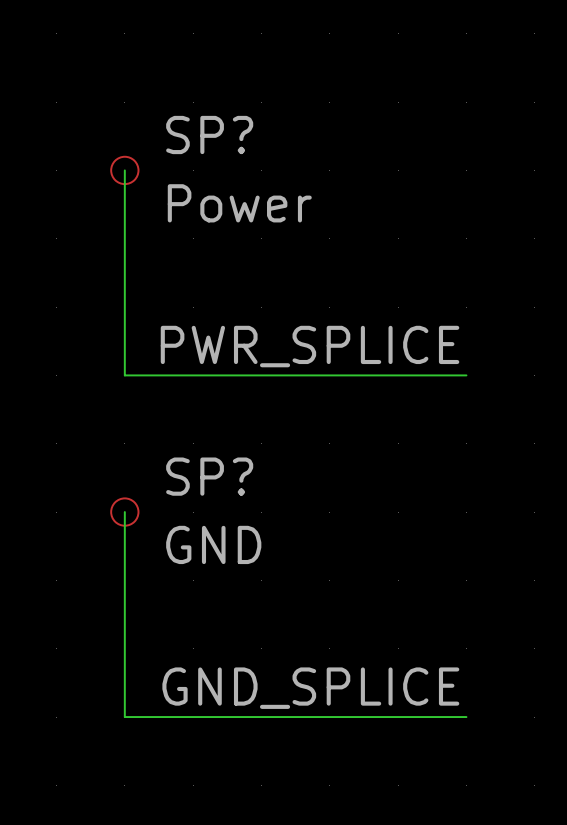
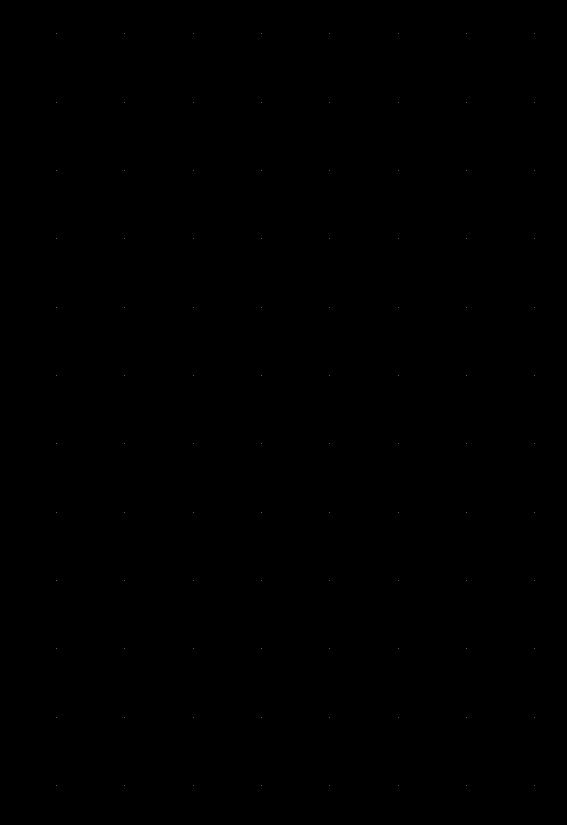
wire: (124, 170) (124, 375) (466, 375) -> none
SP?: Power (124, 170) -> none
label: PWR_SPLICE (310, 346) -> none
wire: (124, 512) (124, 717) (466, 717) -> none
SP?: GND (124, 512) -> none
label: GND_SPLICE (310, 688) -> none

